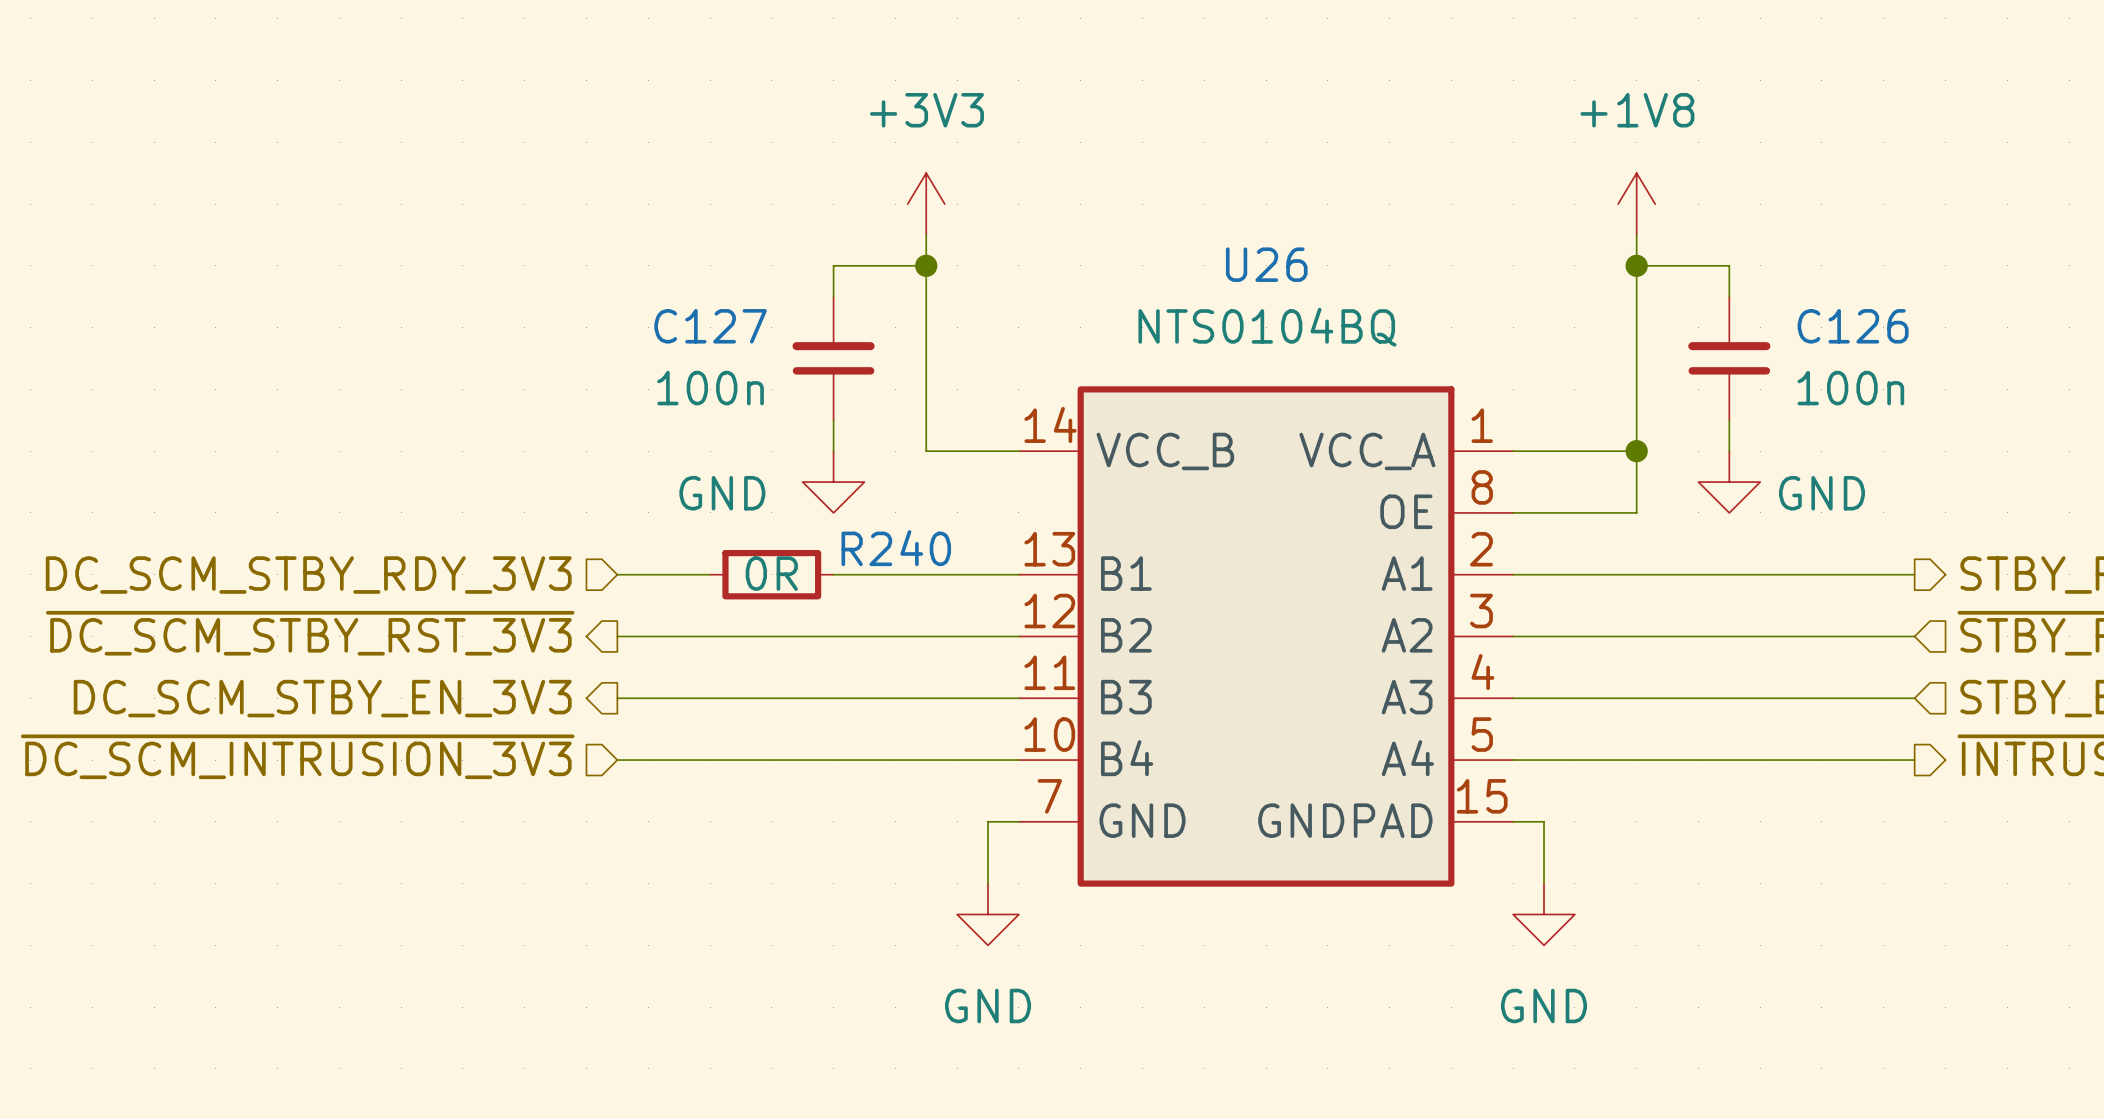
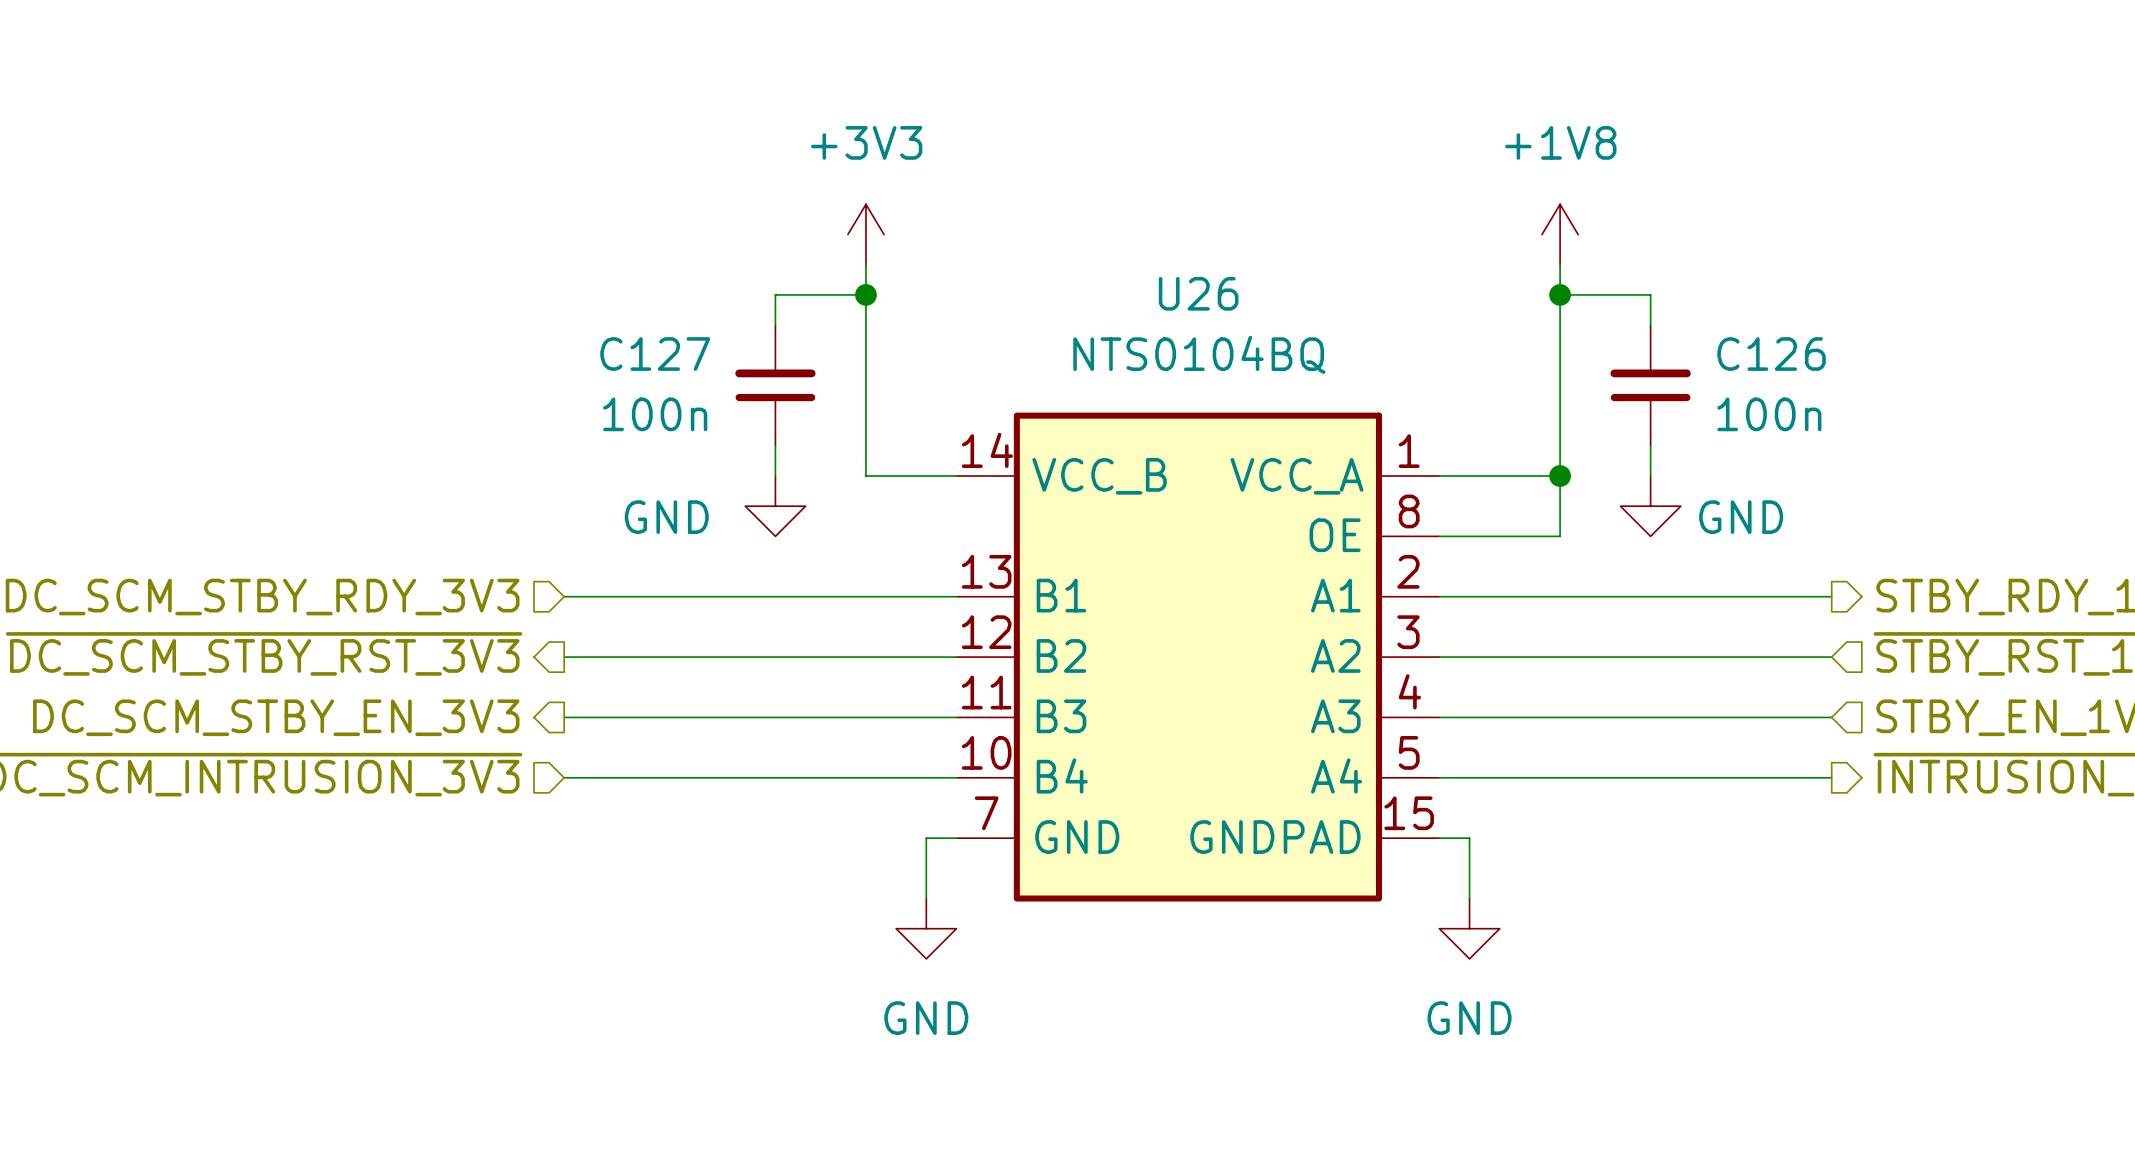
wire: none -> (654, 596) (775, 596)
R240: (771, 574) -> none

